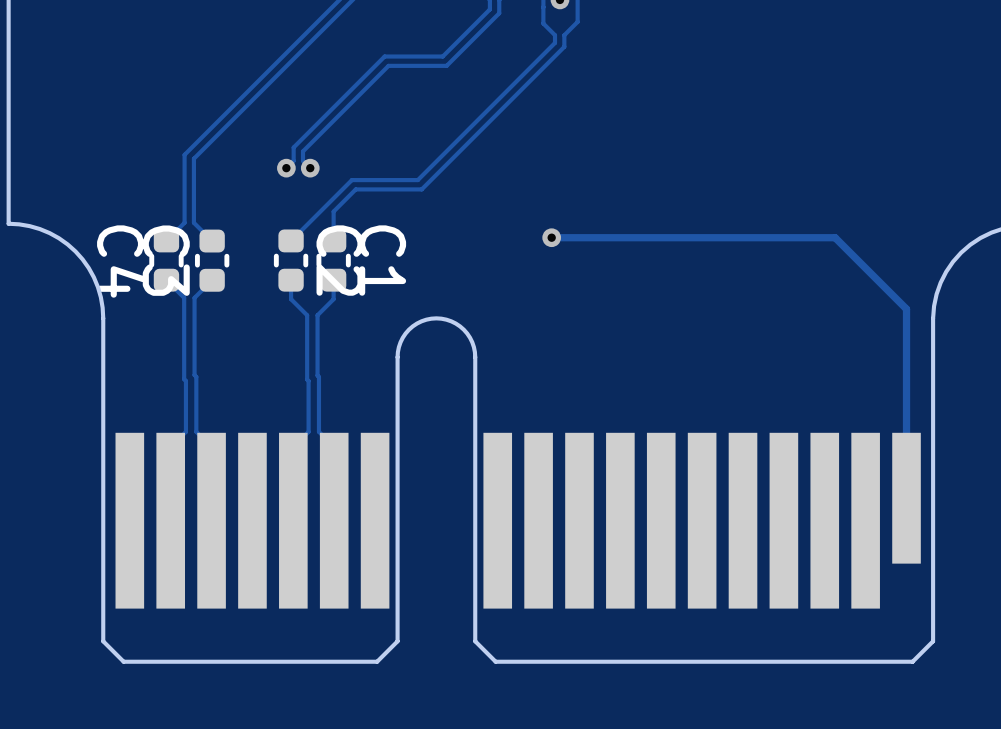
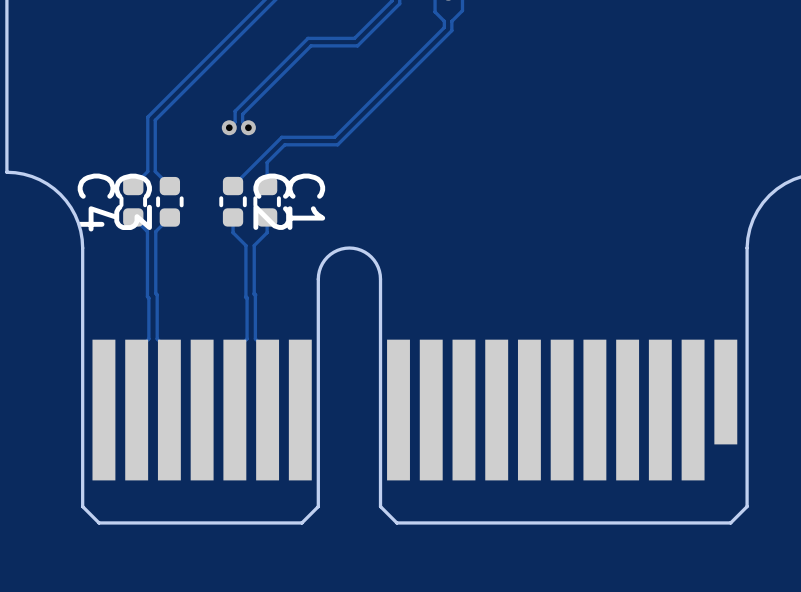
track: (551, 237) (835, 237) (906, 309) (906, 498) -> none
via: (551, 237) -> none

